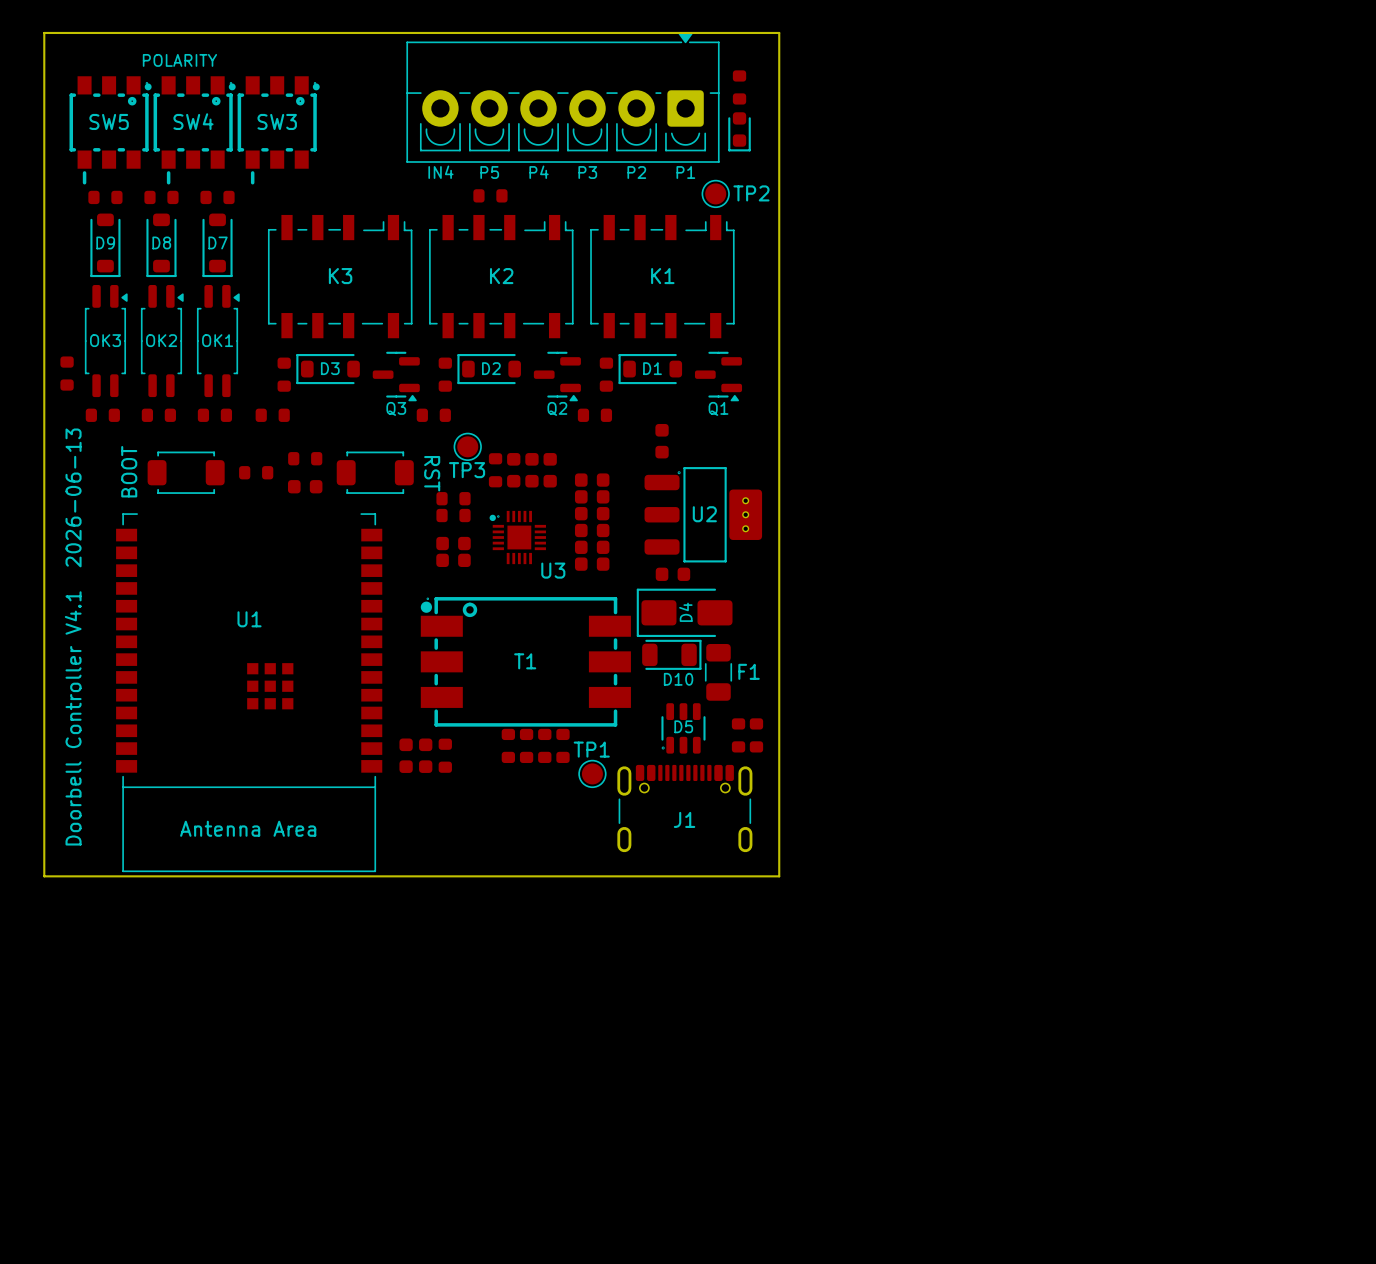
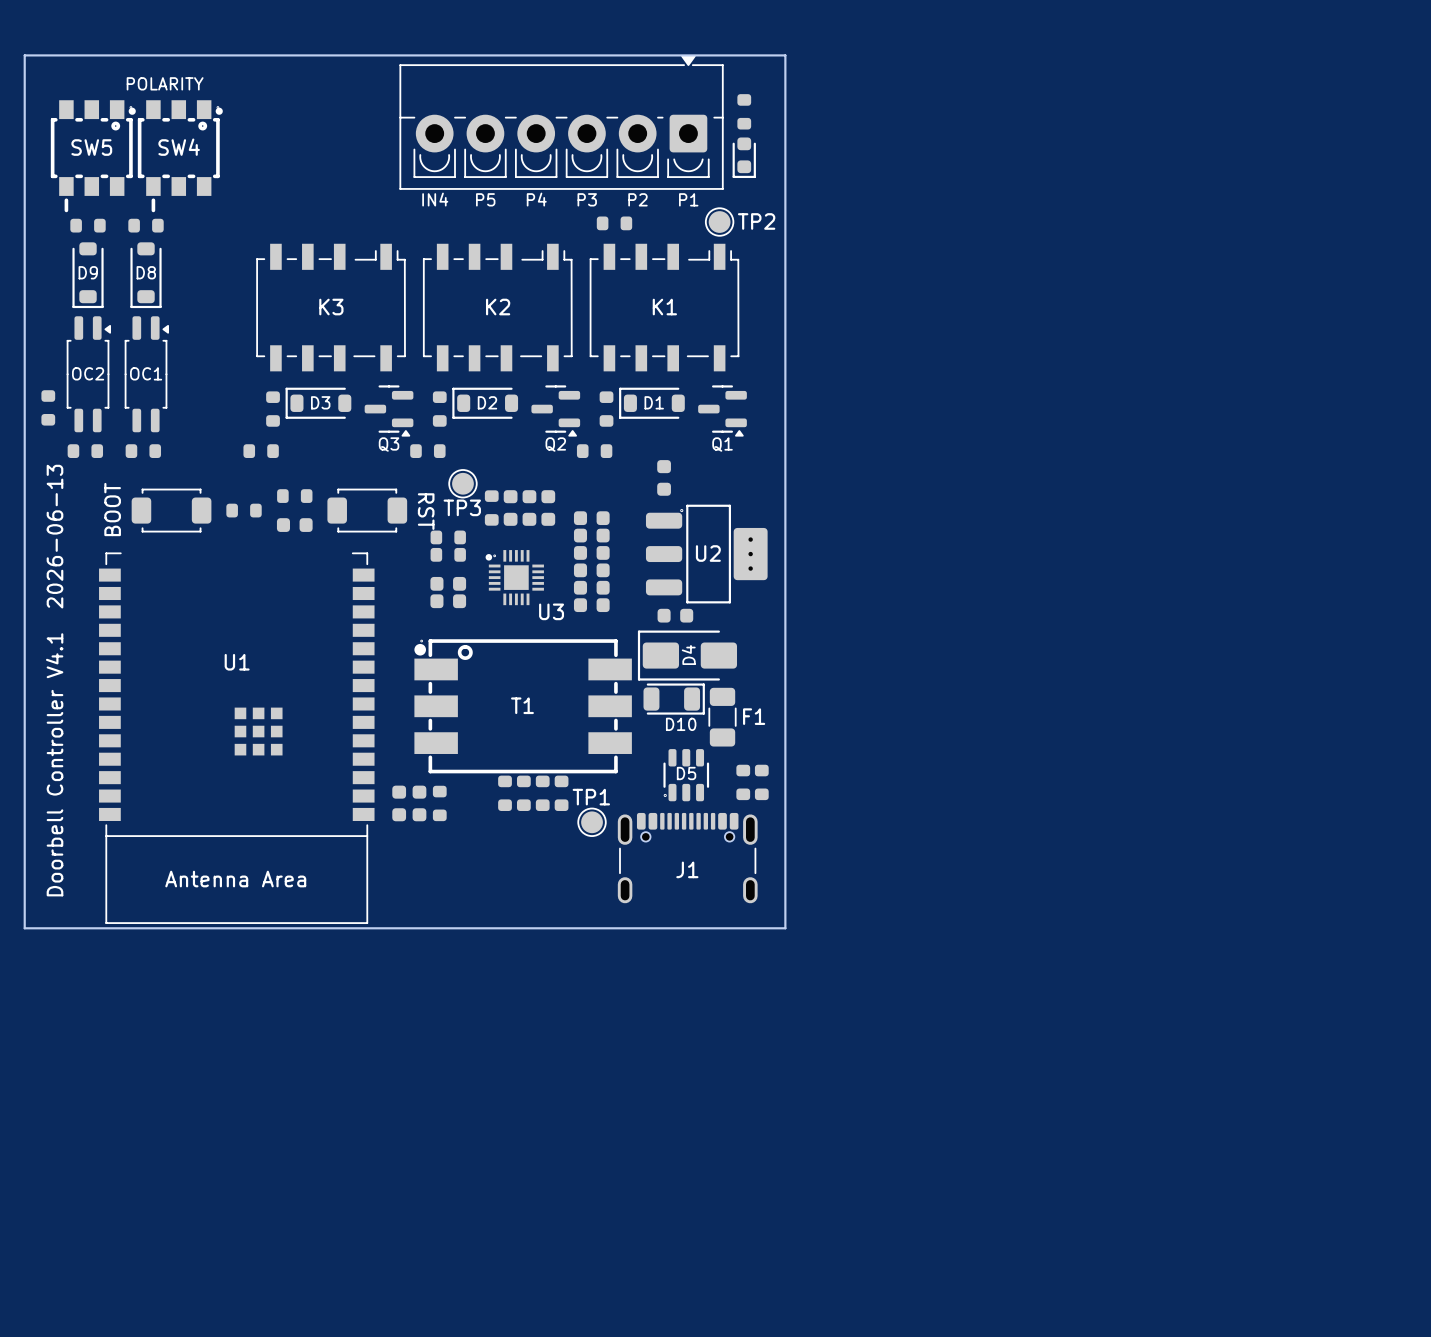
SW3: (278, 122) -> none
line: (252, 172) (252, 182) -> none
part position: (490, 195) -> (614, 223)
part: (217, 197) -> none
D7: (217, 245) -> none
OK3 name: OK3 (105, 340) -> OC2 (88, 373)
OK2 name: OK2 (161, 340) -> OC1 (146, 373)
OK1: (218, 341) -> none
part: (214, 415) -> none

